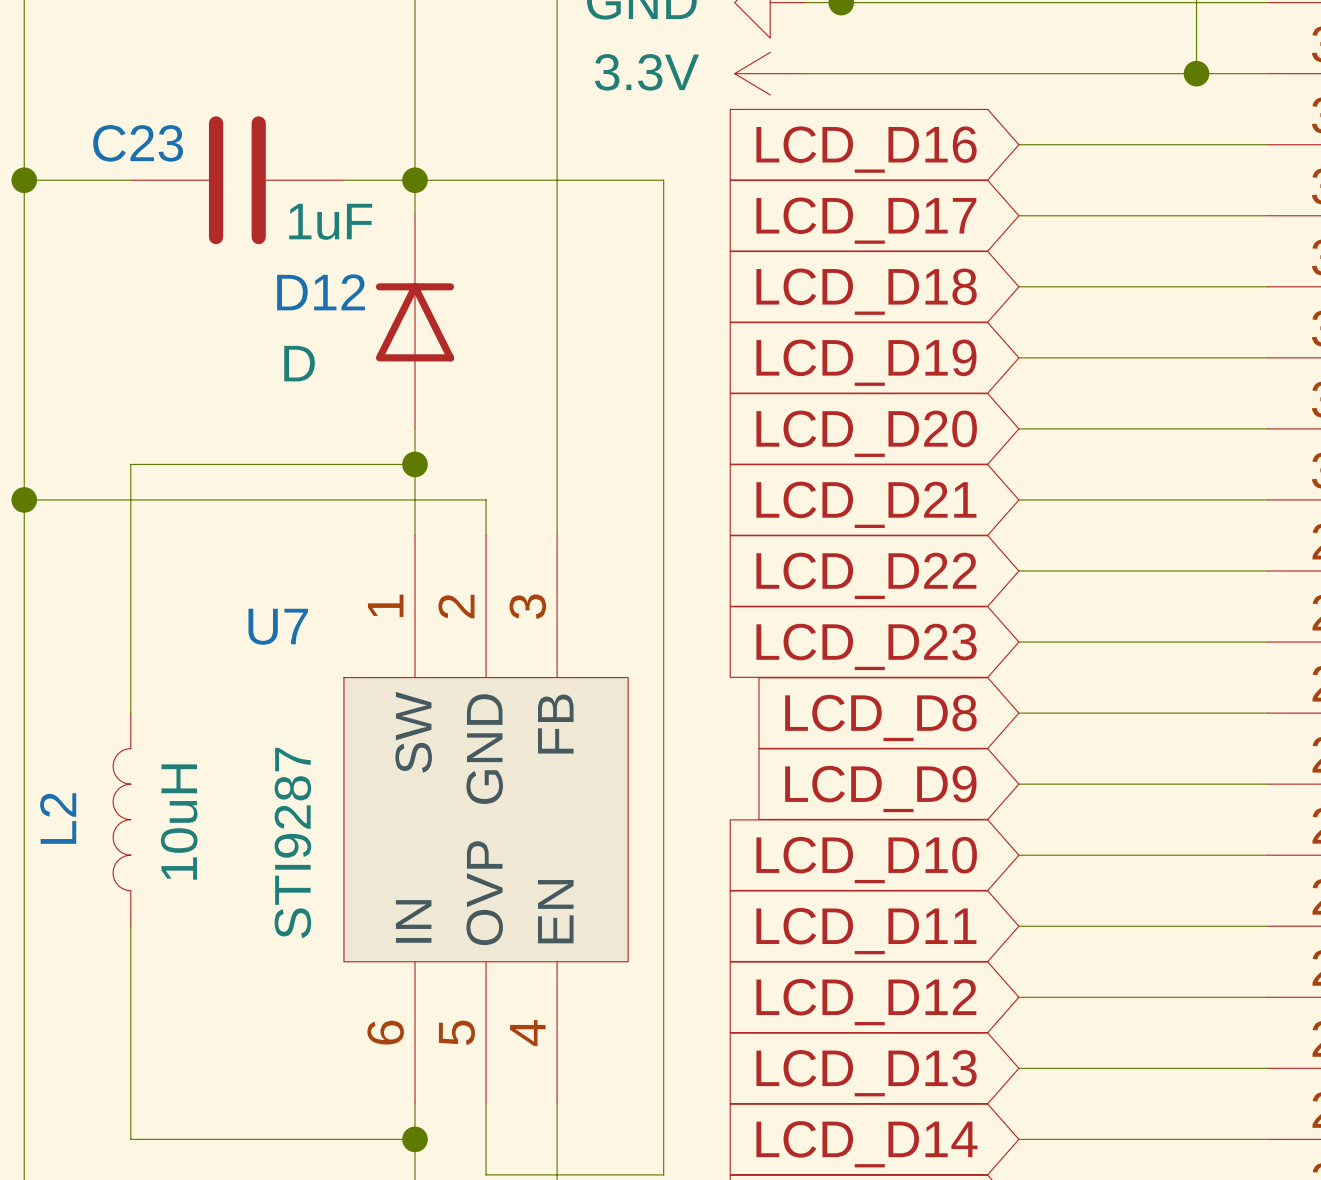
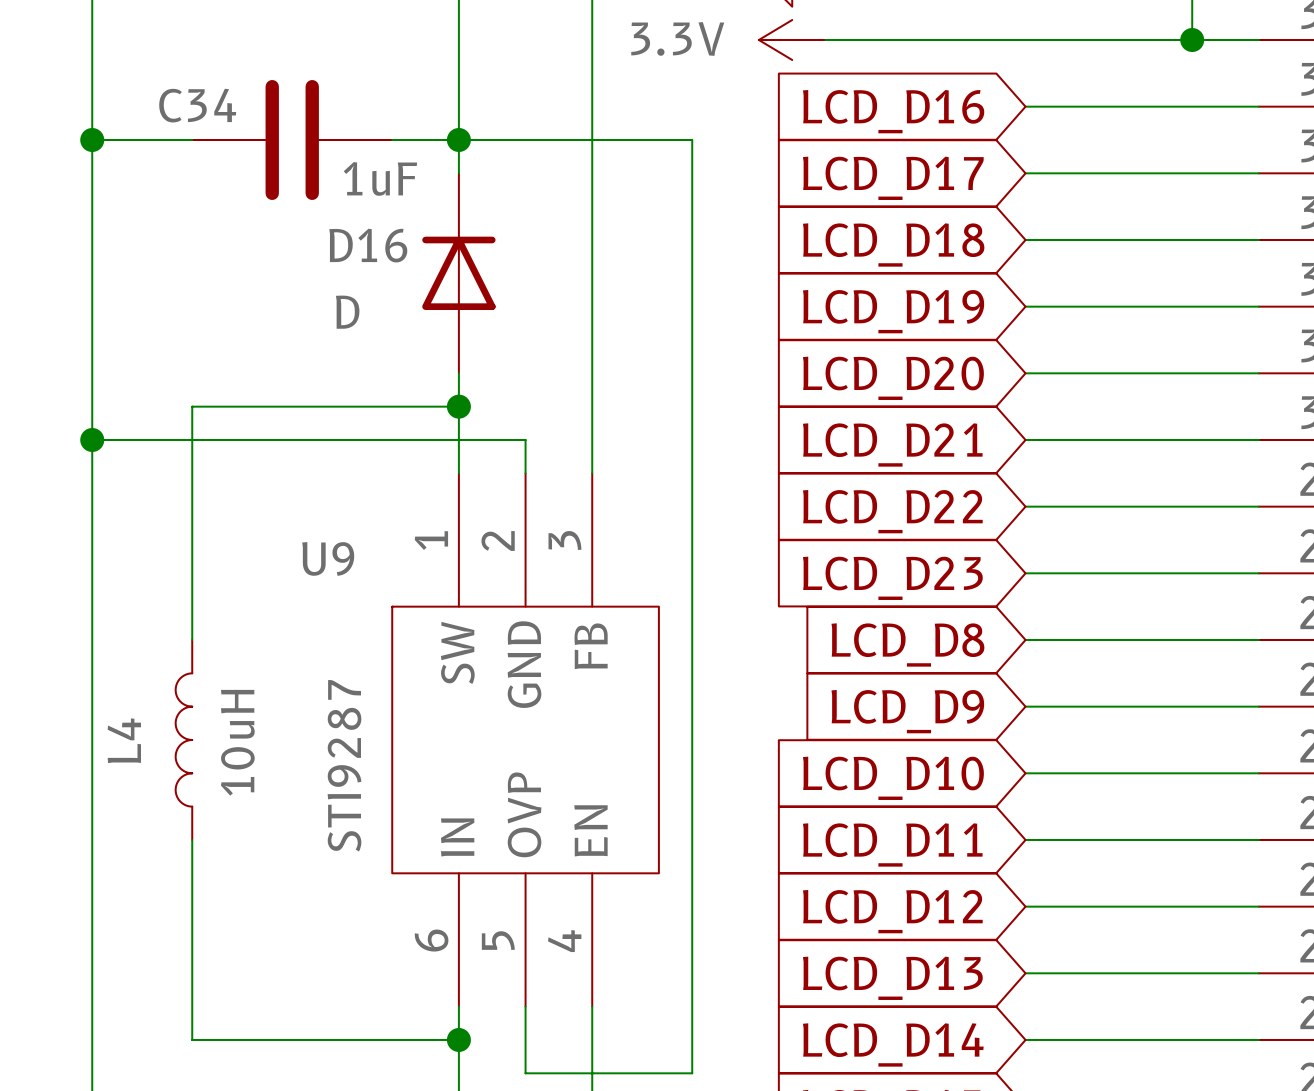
C23 name: C23 (138, 143) -> C34 (197, 105)
D12 name: D12 (321, 292) -> D16 (368, 245)
U7 name: U7 (278, 626) -> U9 (328, 558)
L2 name: L2 (58, 818) -> L4 (124, 740)

